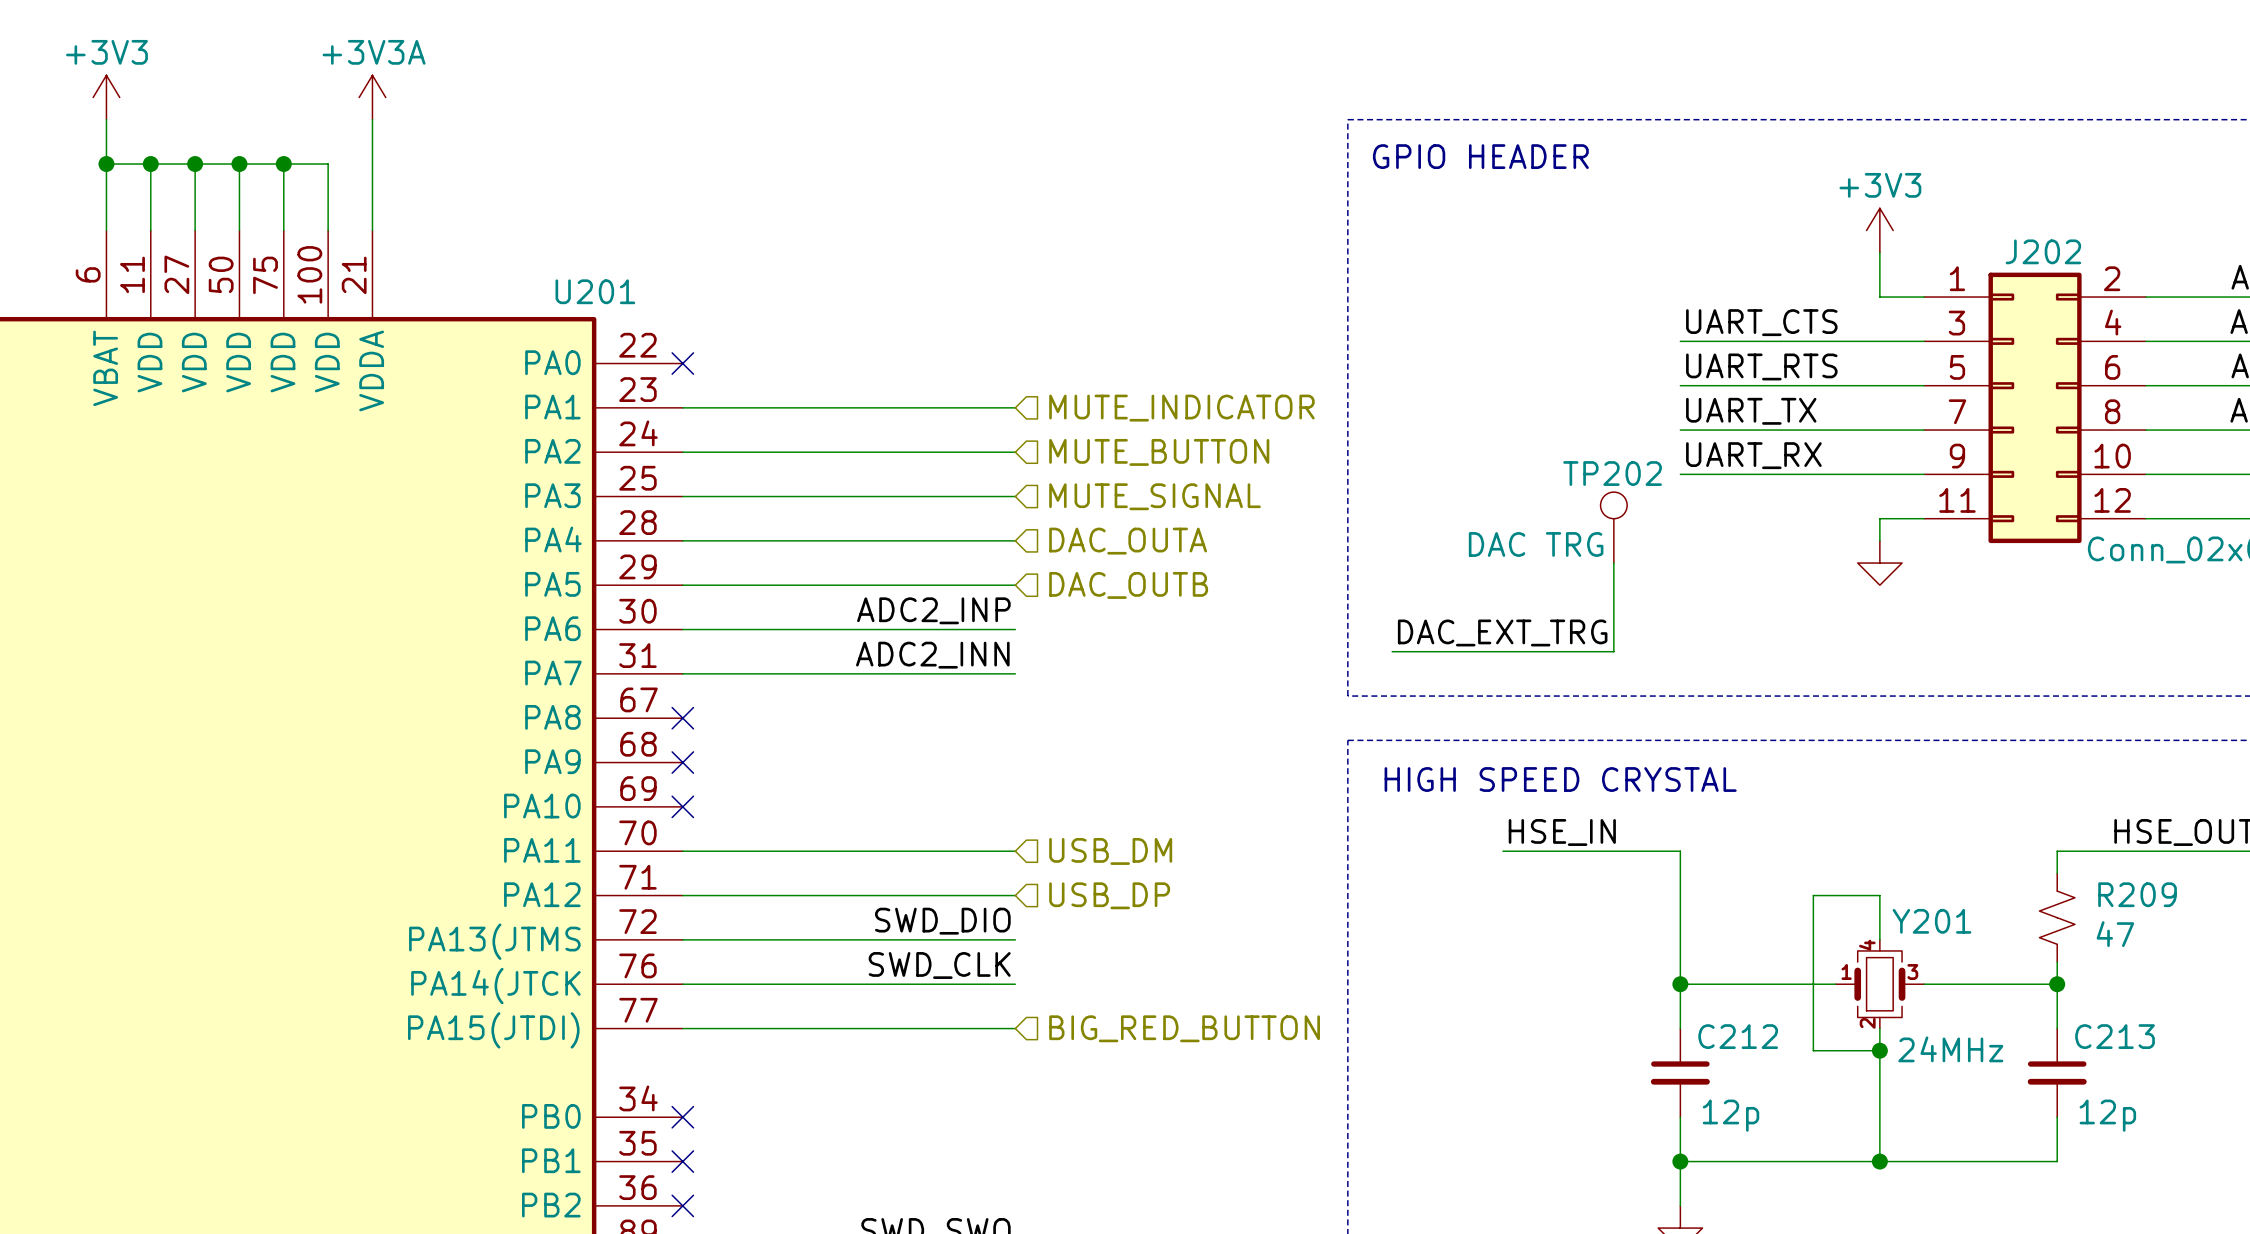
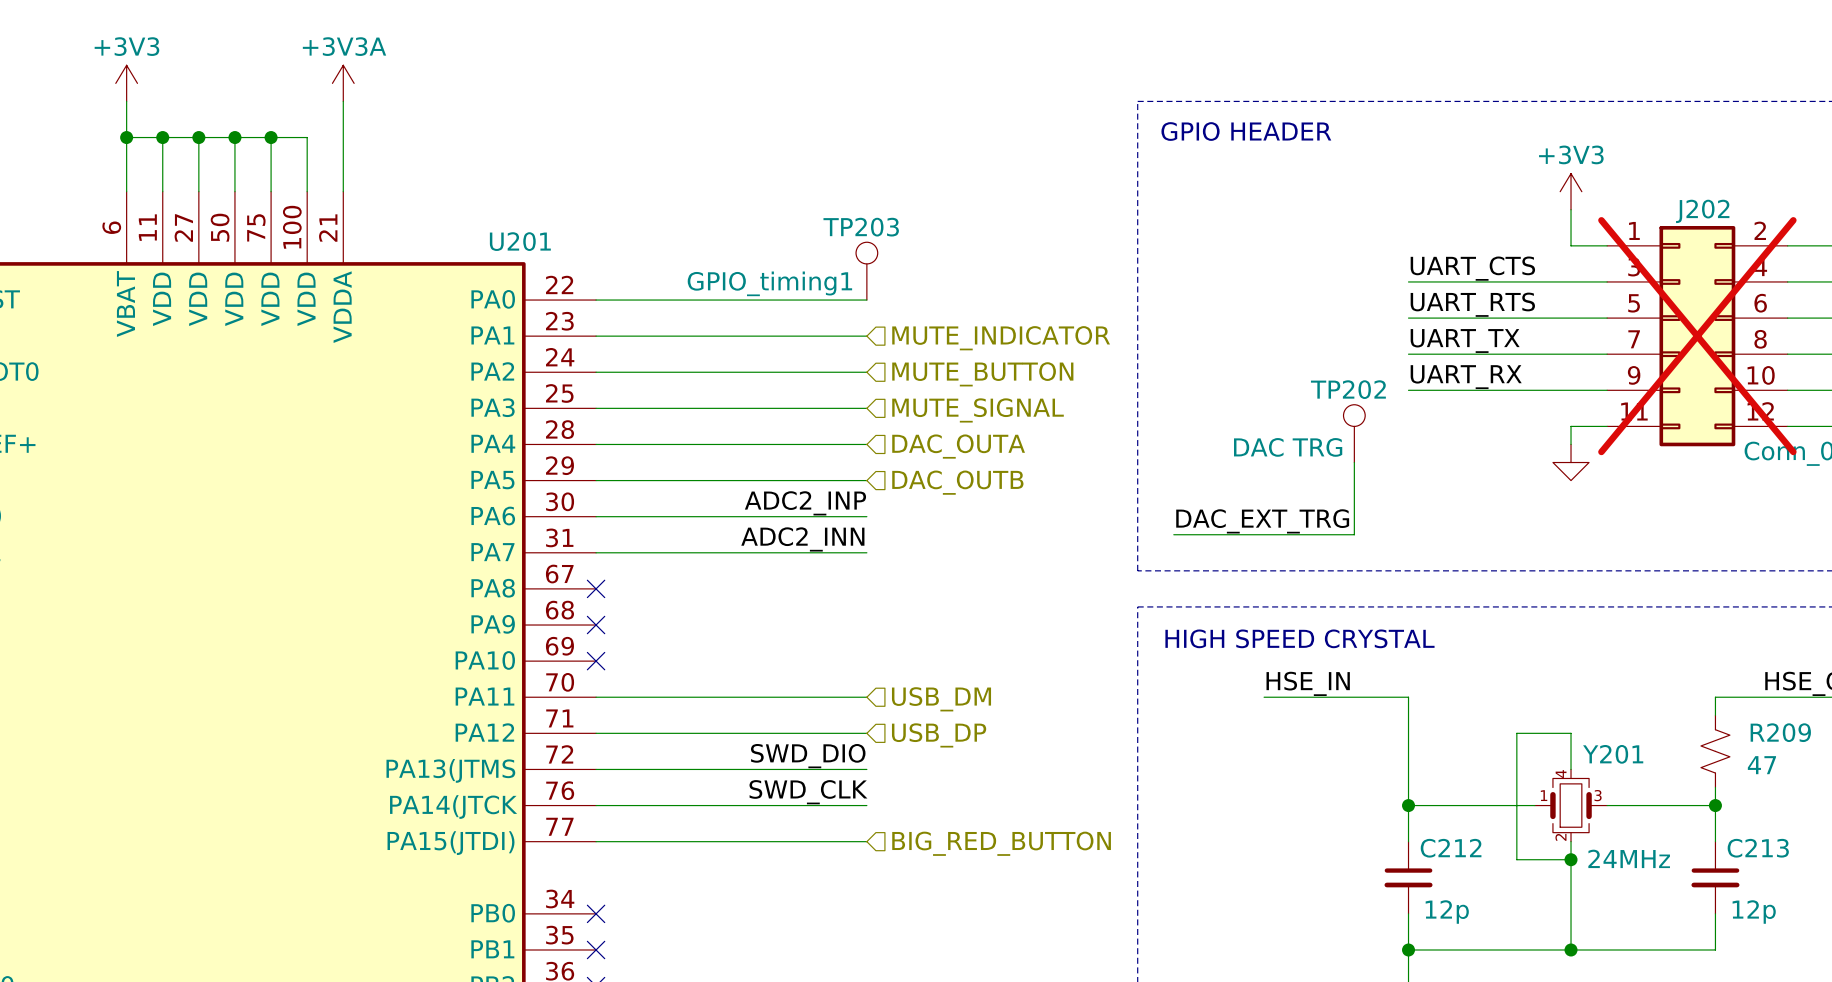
TP203: none -> GPIO_timing1 (866, 271)
wire: none -> (596, 300) (866, 300)
no-connect mark: (682, 363) -> none
J202 do-not-place cross: none -> (1697, 336)

